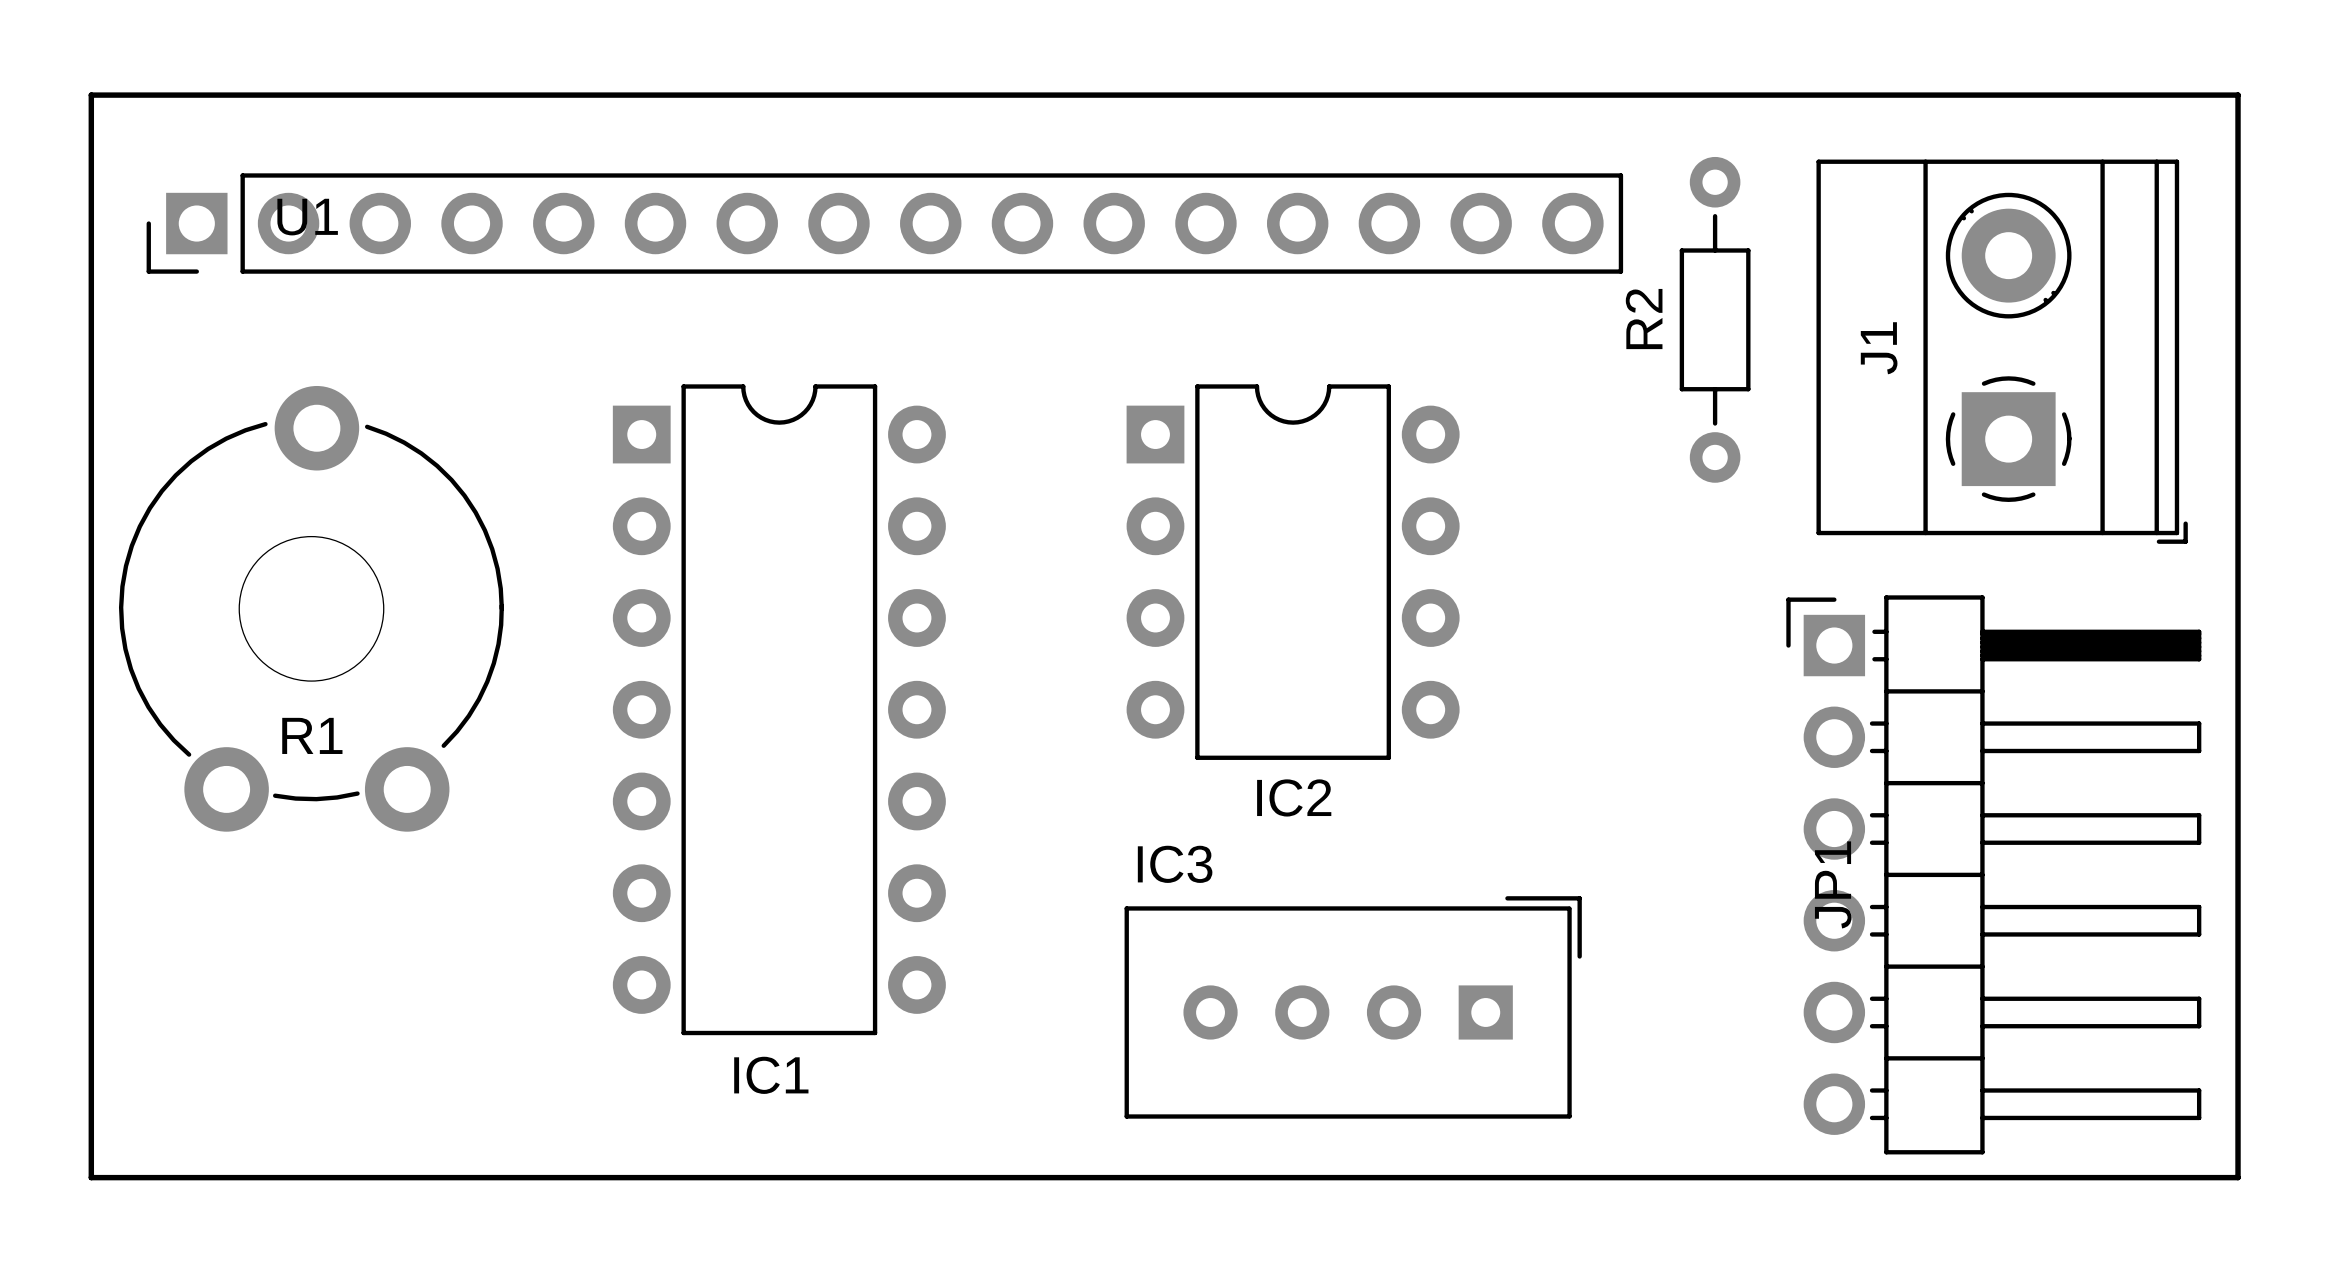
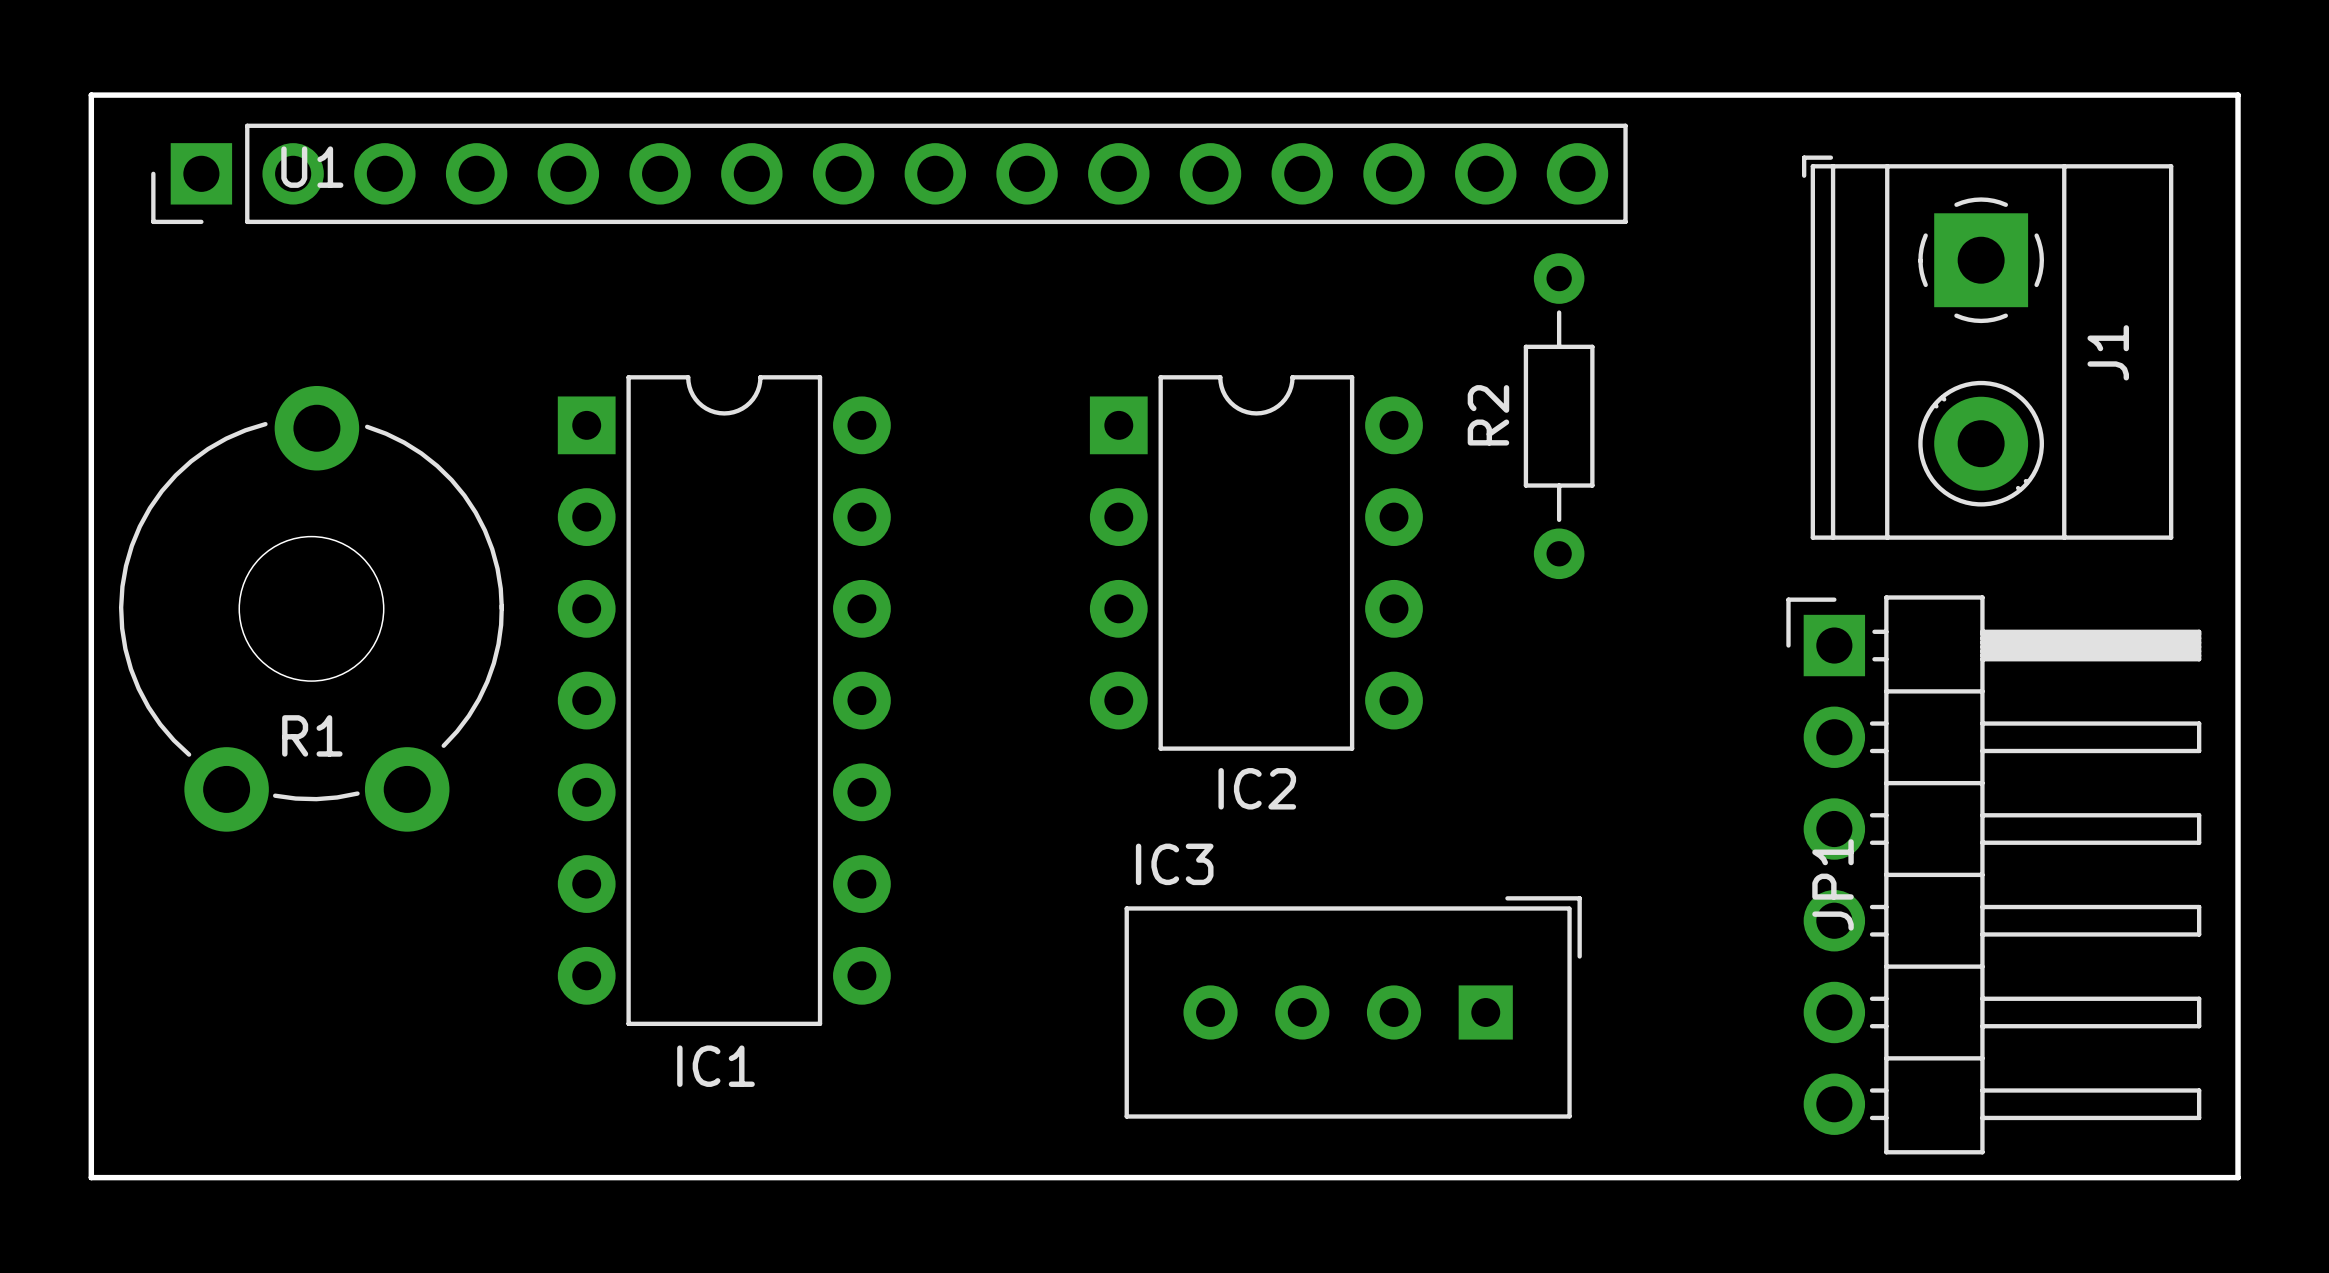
U1 position: (884, 223) -> (889, 173)
R2 position: (1715, 319) -> (1559, 416)
J1 rotation: 0° (2002, 351) -> 180° (1987, 347)
IC2 position: (1293, 572) -> (1256, 562)
IC1 position: (779, 709) -> (724, 700)

